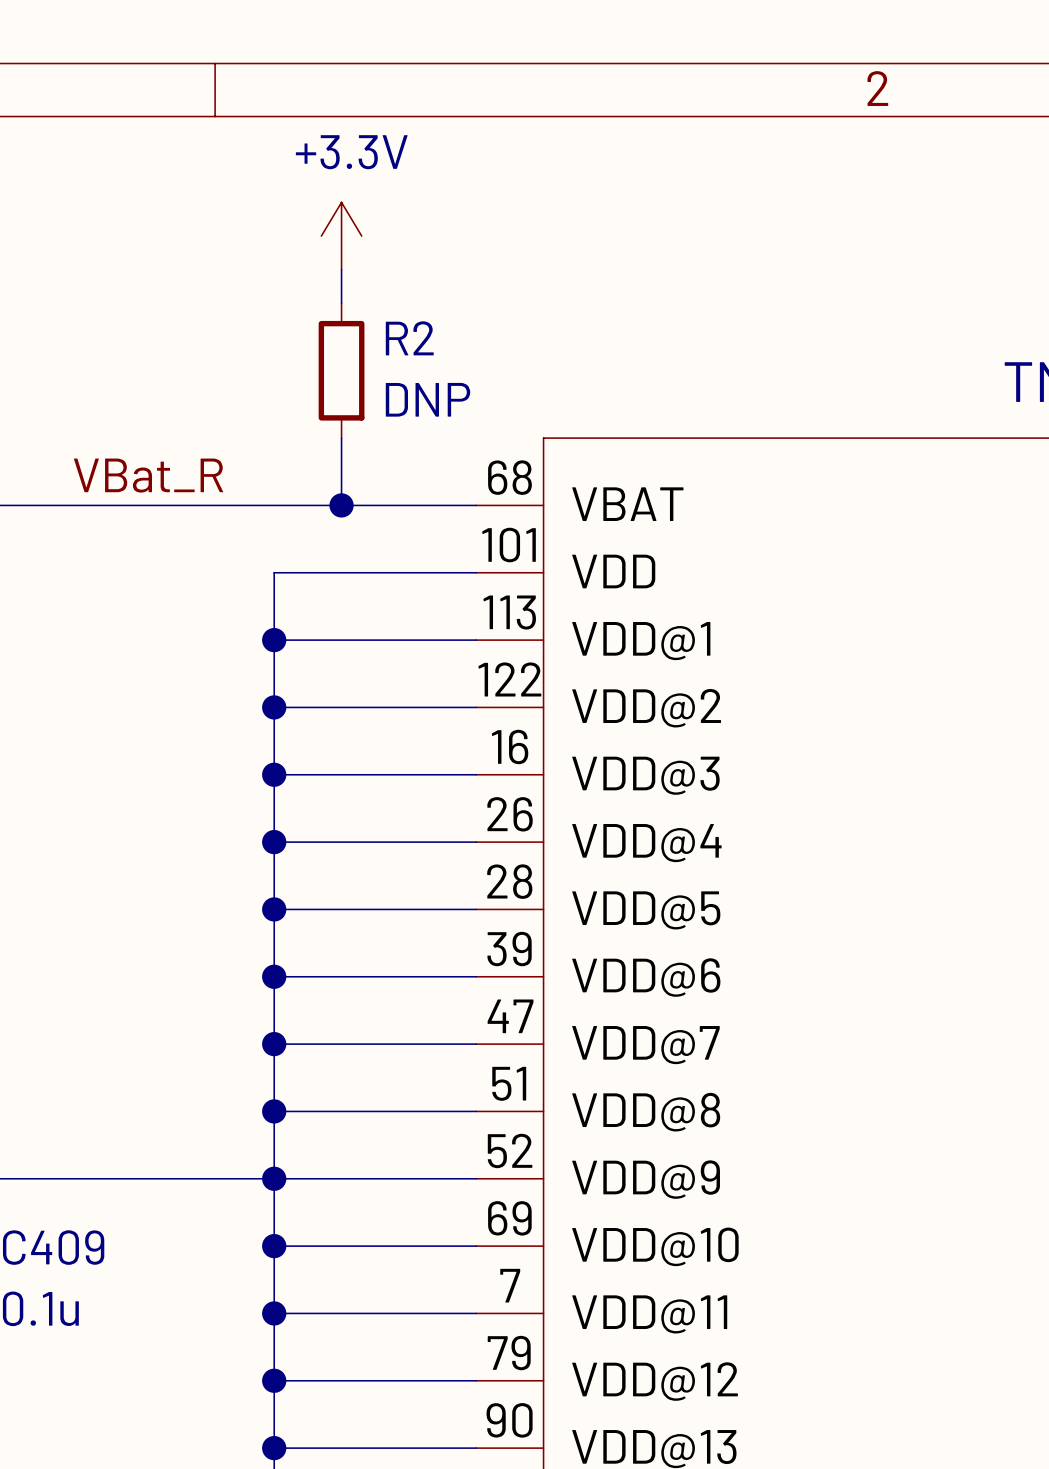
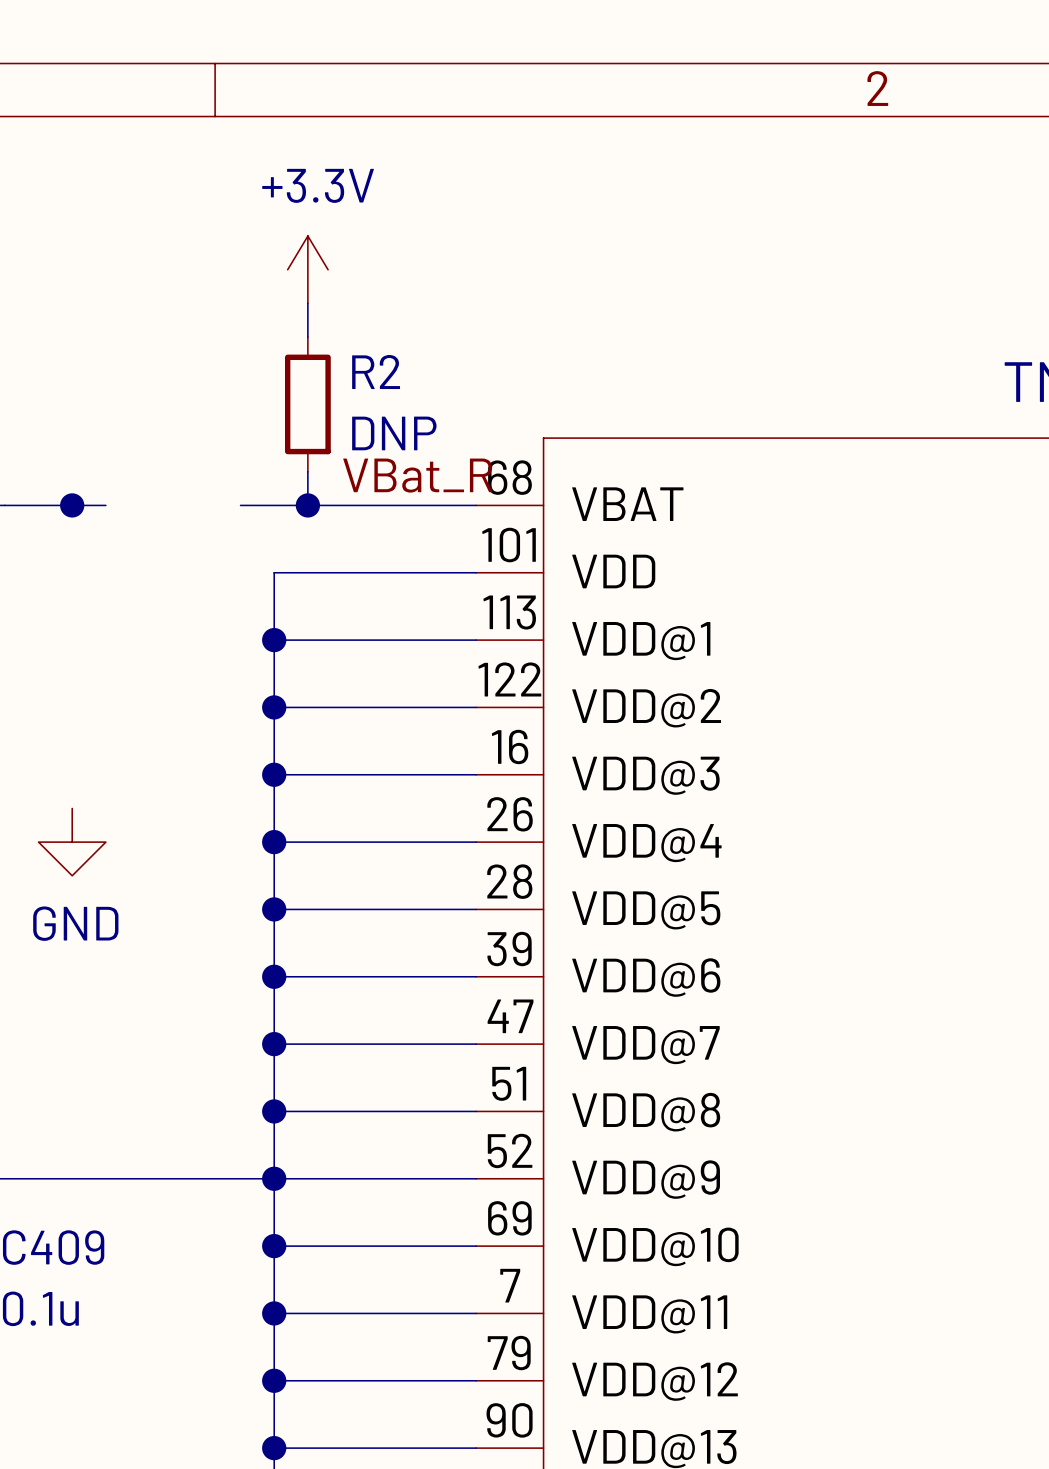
power symbol position: +3.3V (341, 236) -> +3.3V (307, 269)
wire: (341, 269) (341, 303) -> (307, 303) (307, 337)
R2 position: (341, 370) -> (307, 404)
wire: (341, 438) (341, 505) -> none
wire: none -> (307, 471) (307, 505)
label position: VBat_R (148, 475) -> VBat_R (417, 475)
junction: none -> (72, 505)
wire: (105, 505) (240, 505) -> none
junction position: (341, 505) -> (307, 505)
power symbol: none -> GND (72, 842)

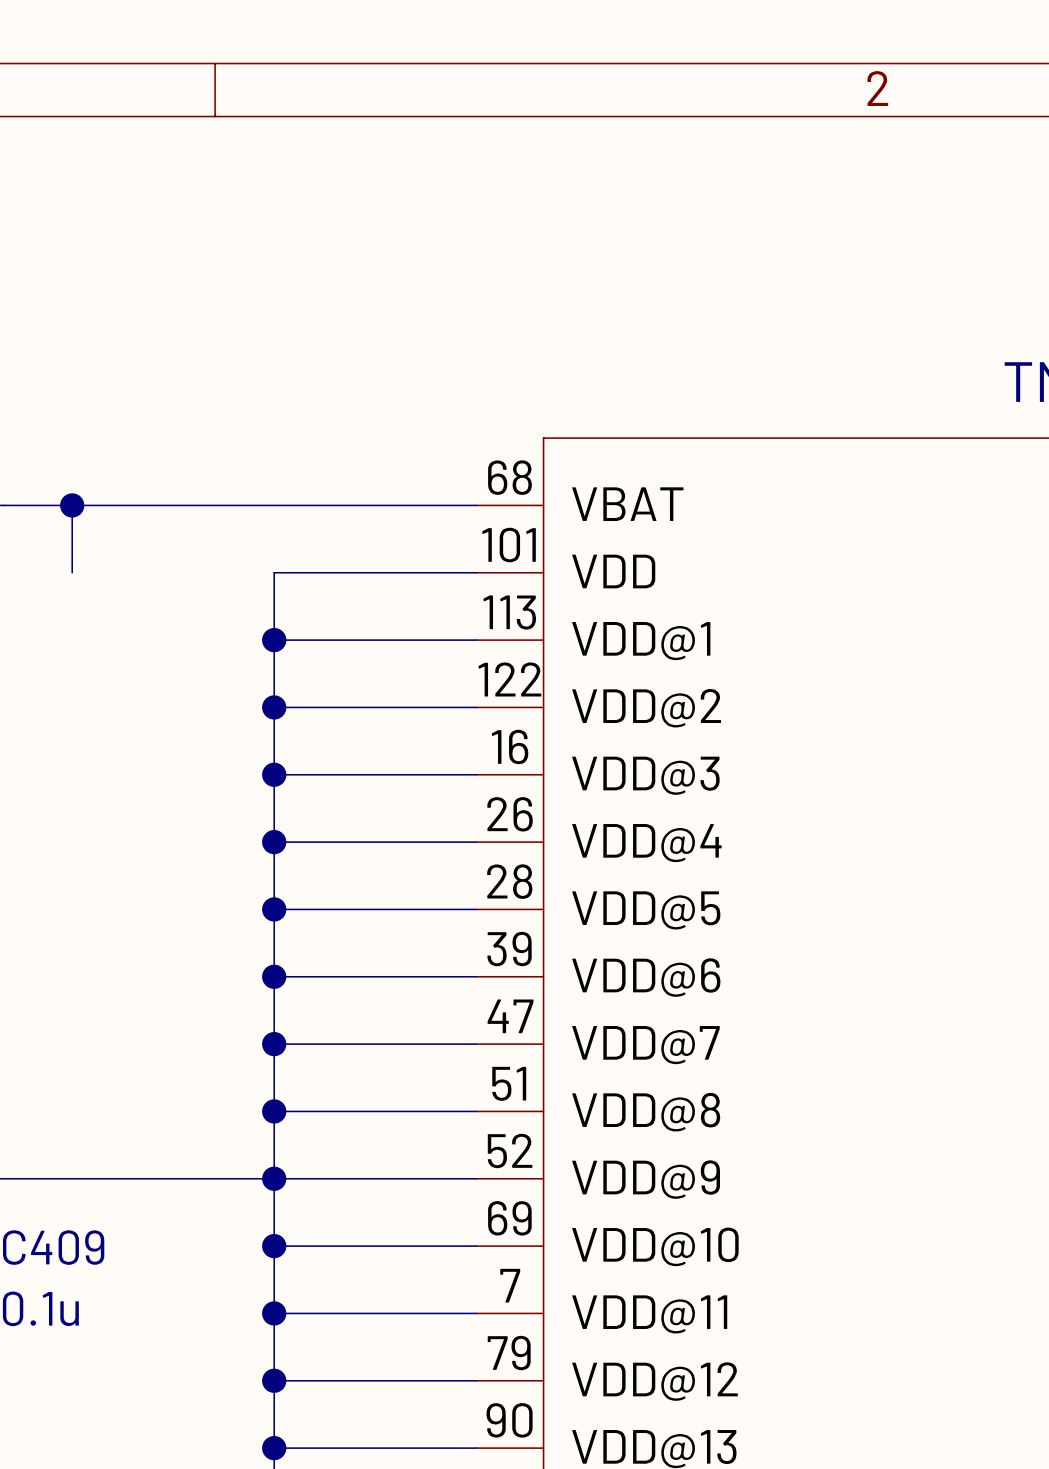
power symbol: +3.3V (307, 269) -> none
wire: (307, 303) (307, 337) -> none
R2: DNP (307, 404) -> none
wire: (307, 471) (307, 505) -> none
label: VBat_R (417, 475) -> none
wire: none -> (72, 505) (72, 572)
wire: none -> (105, 505) (240, 505)
junction: (307, 505) -> none
power symbol: GND (72, 842) -> none

